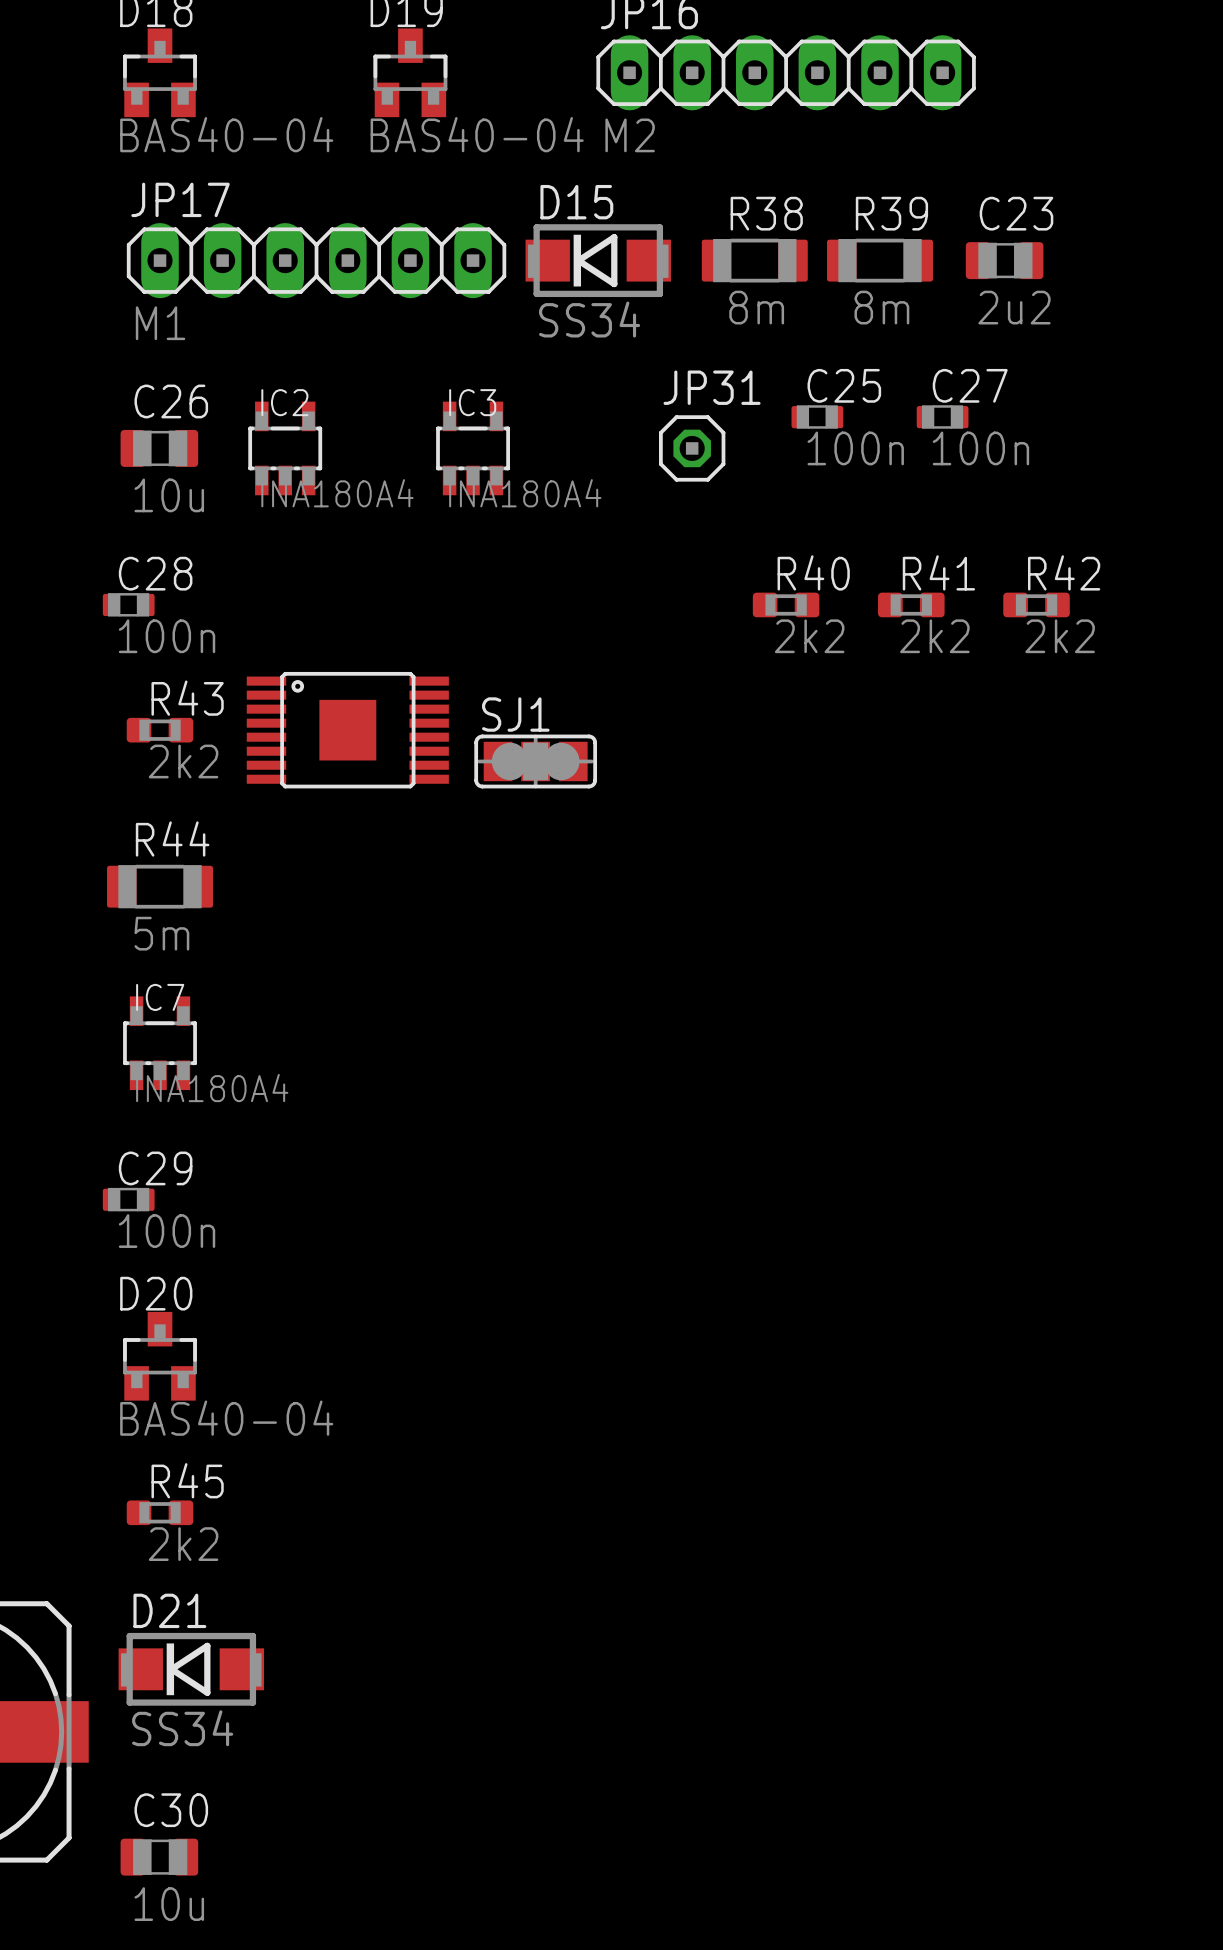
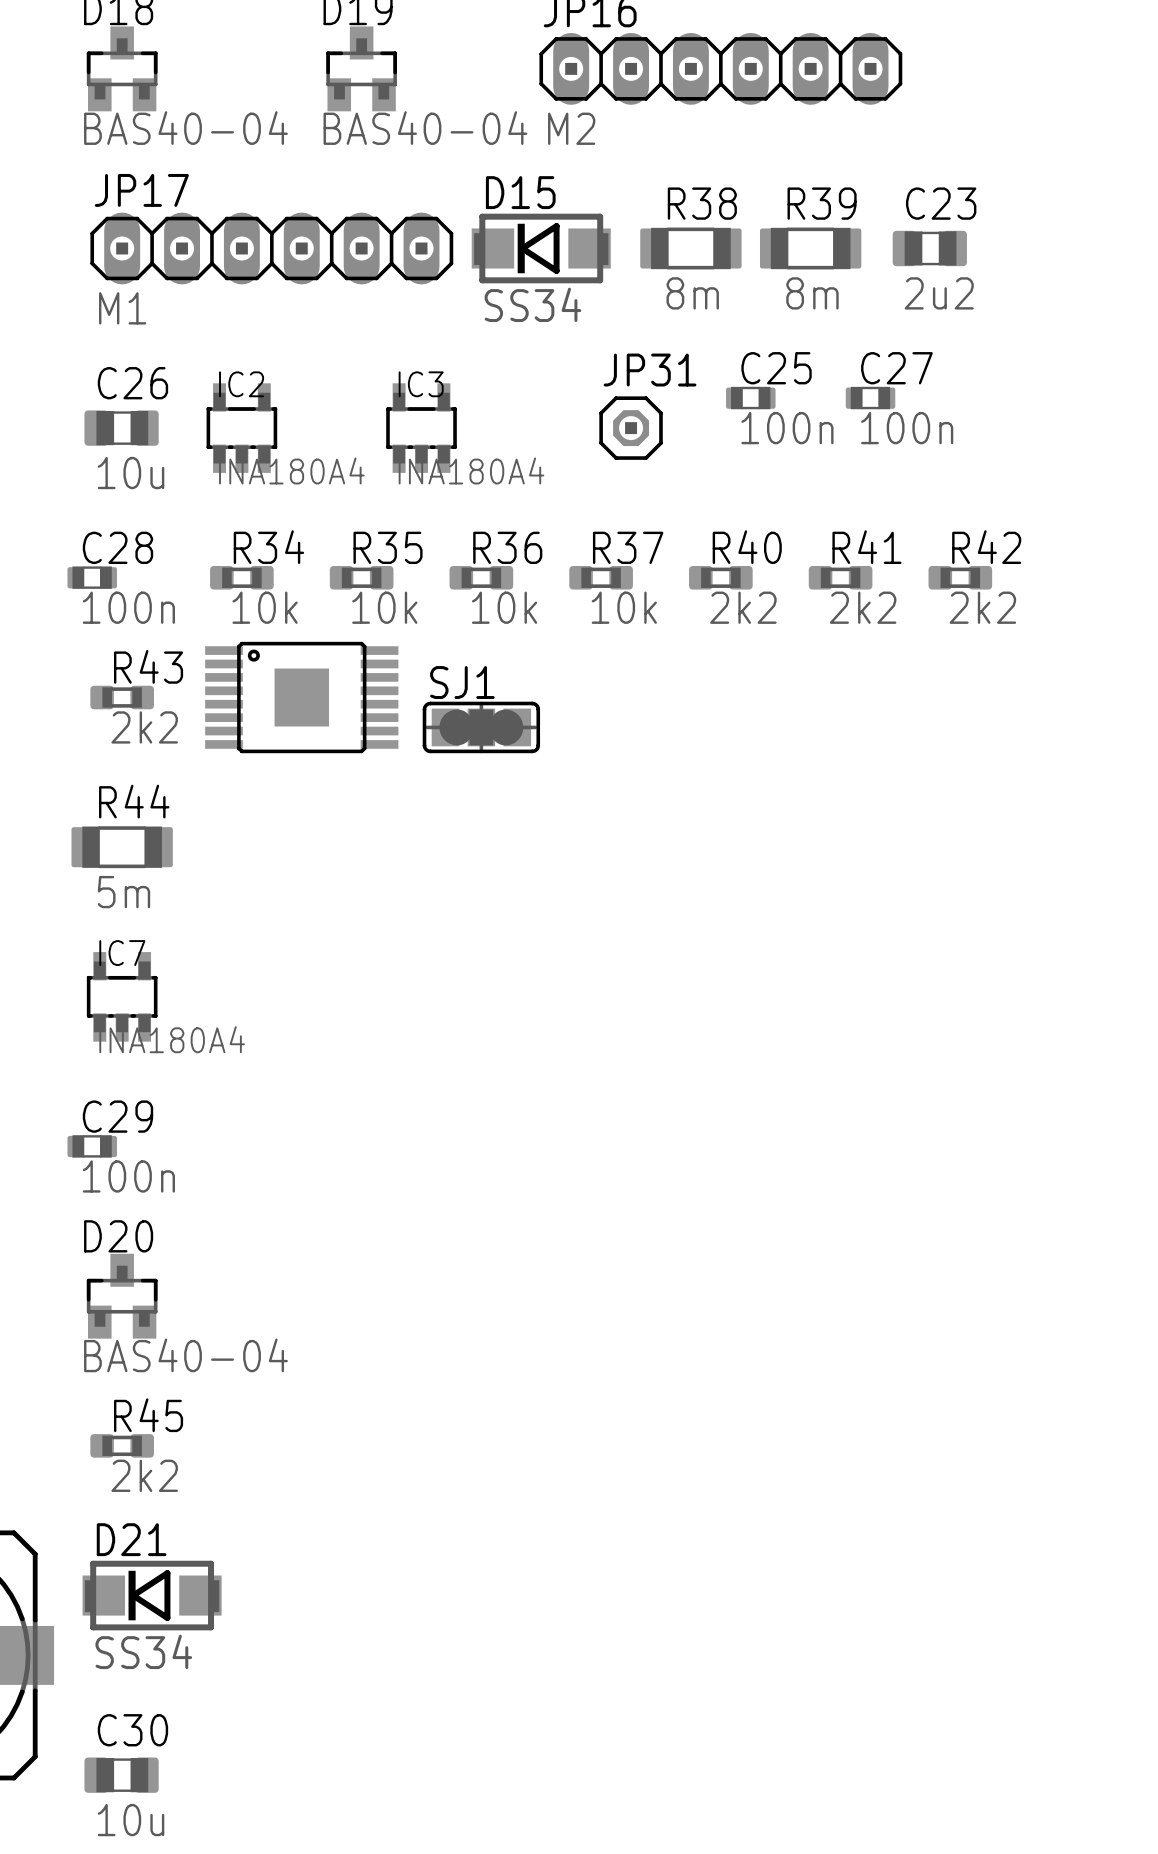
R34: none -> 10k (241, 577)
R35: none -> 10k (361, 577)
R36: none -> 10k (481, 577)
R37: none -> 10k (601, 577)

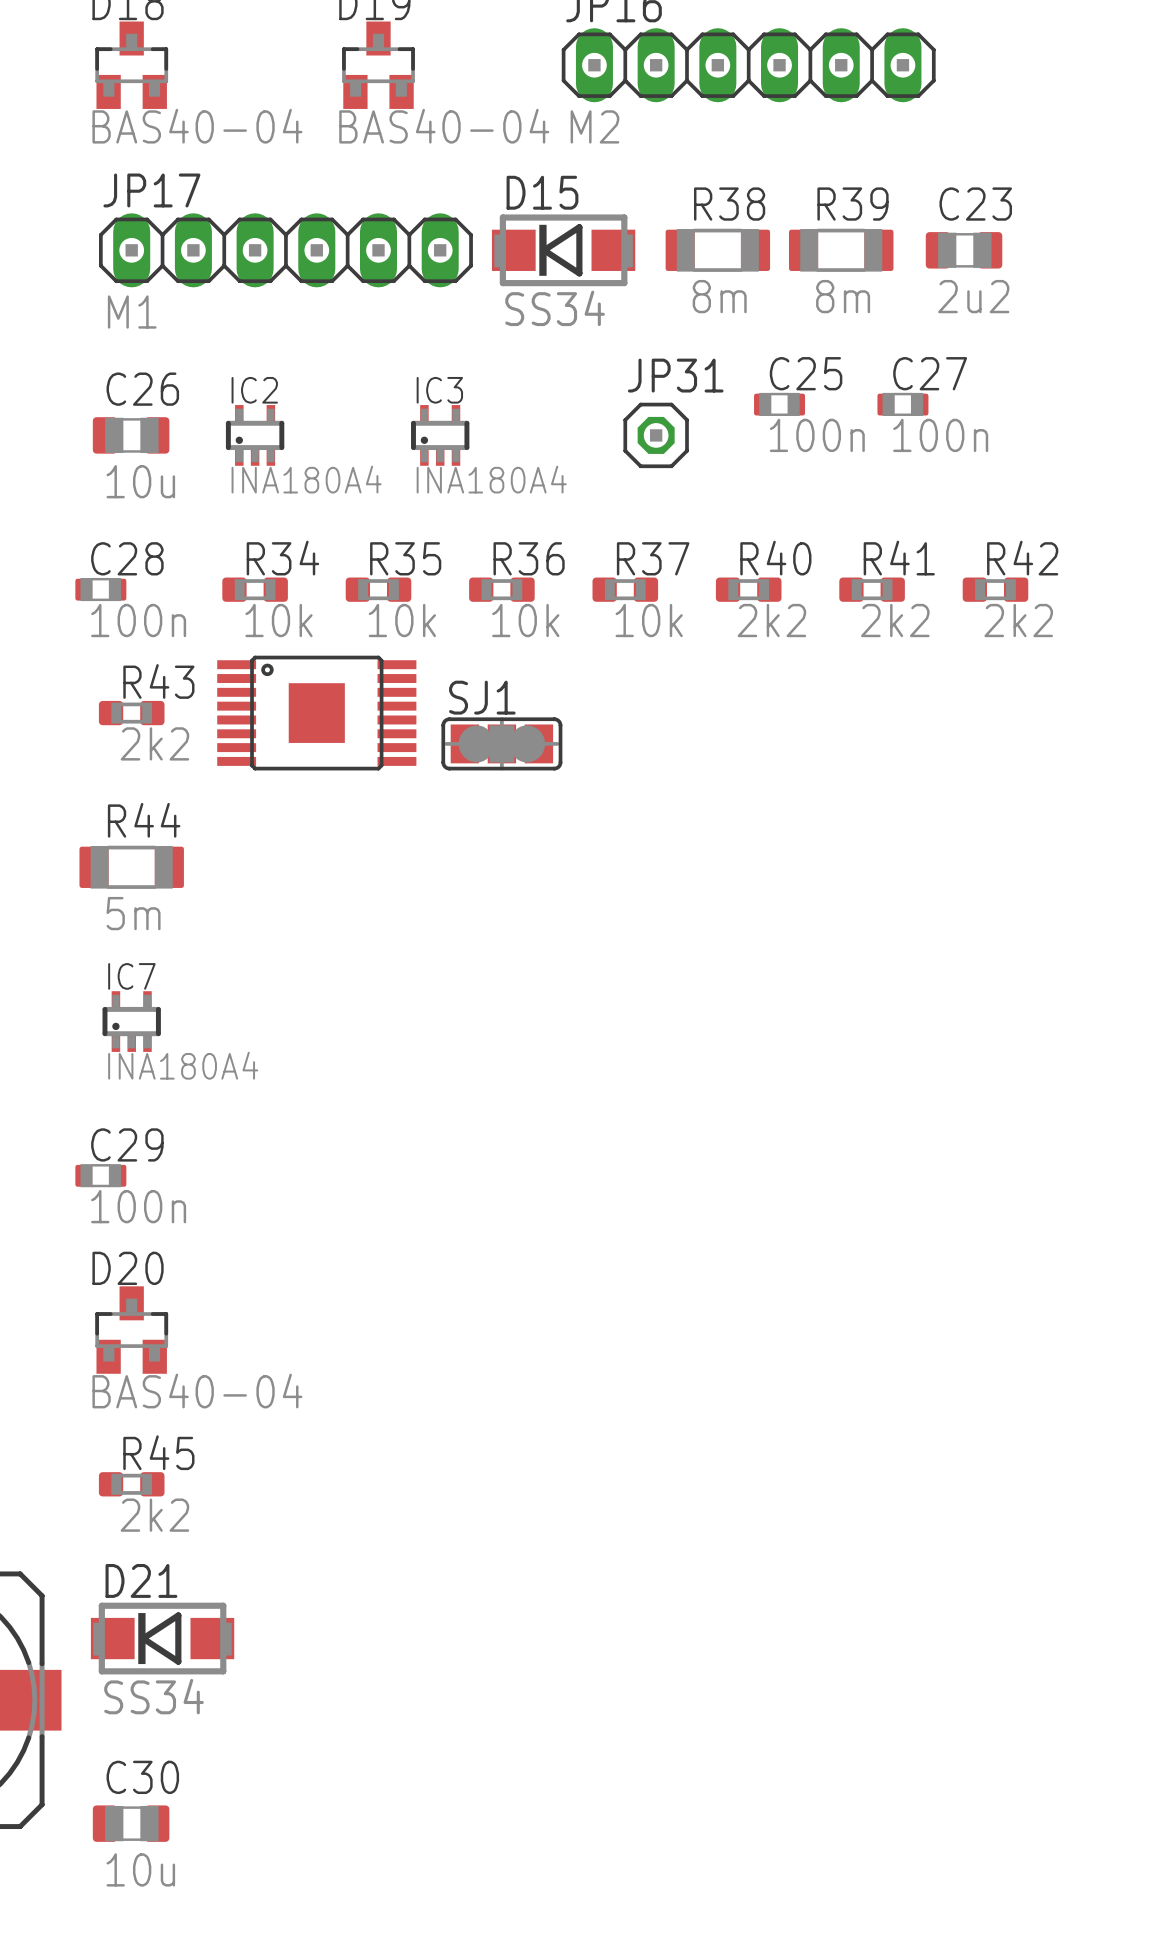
IC2 footprint: [206, 383, 278, 473] -> [225, 405, 285, 466]
IC3 footprint: [386, 383, 457, 473] -> [411, 405, 470, 466]
IC7 footprint: [86, 952, 158, 1042] -> [102, 991, 161, 1052]

